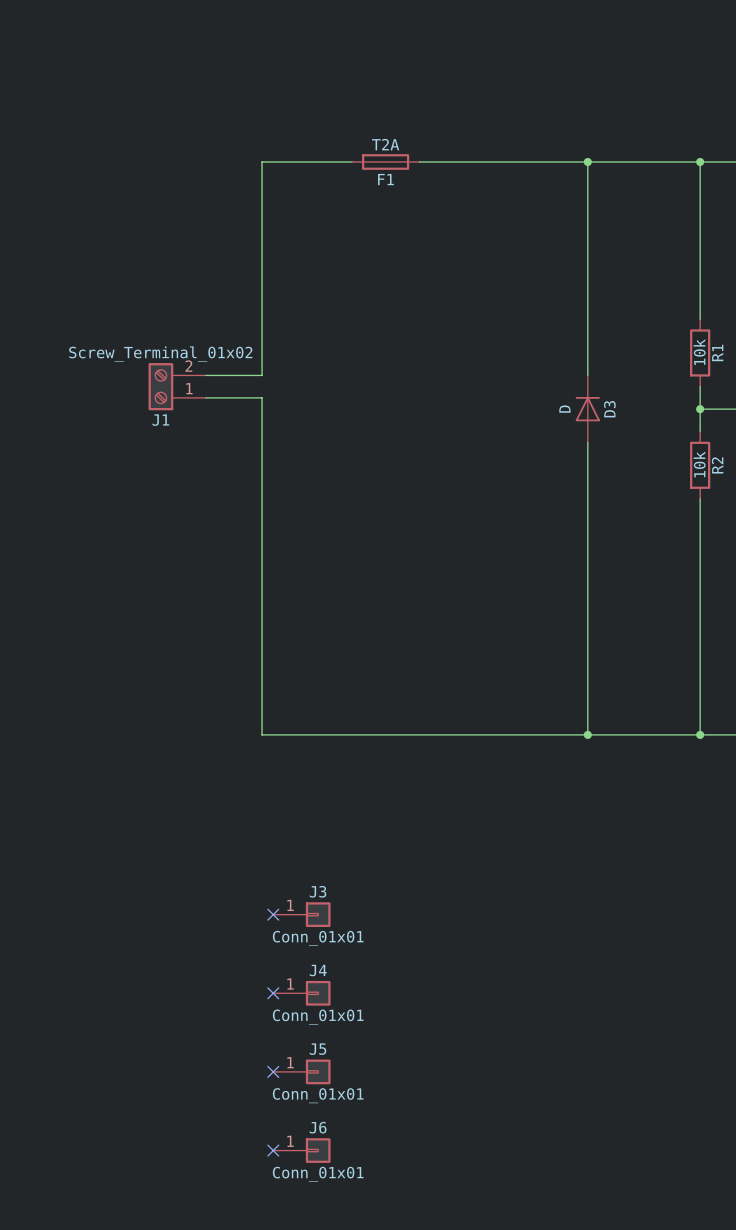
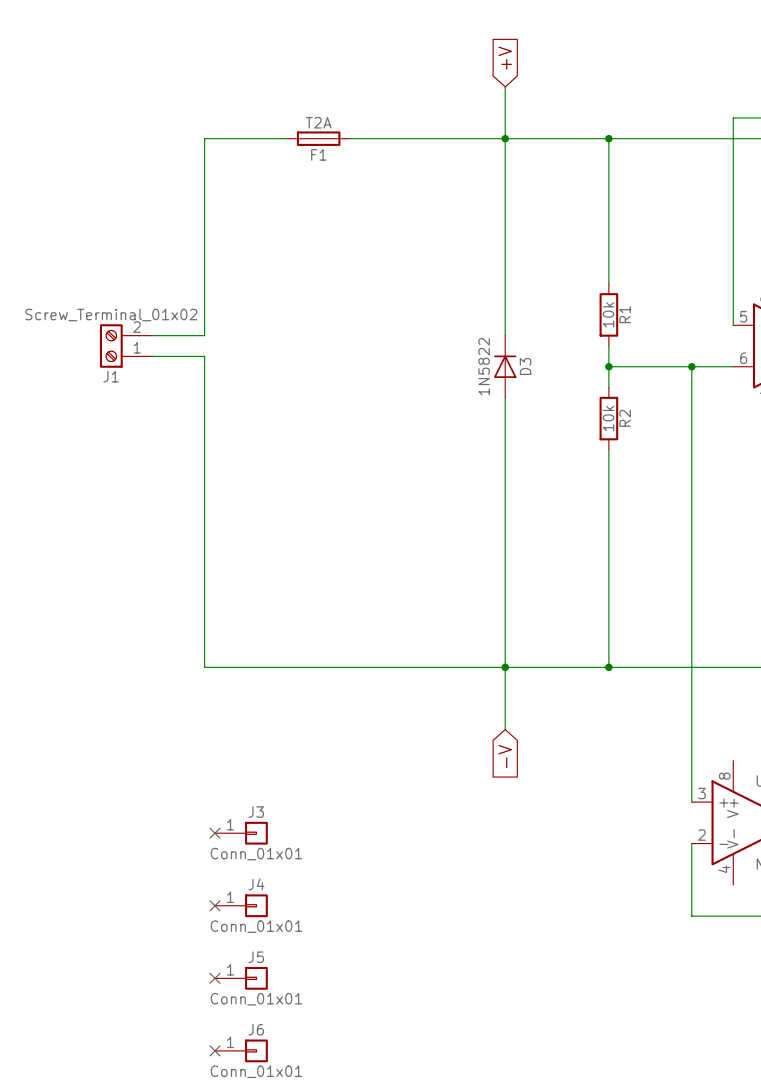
global label: none -> +V (505, 58)
wire: none -> (505, 86) (505, 138)
D3 value: D (564, 409) -> 1N5822 (484, 366)
wire: none -> (505, 667) (505, 729)
global label: none -> -V (505, 756)

